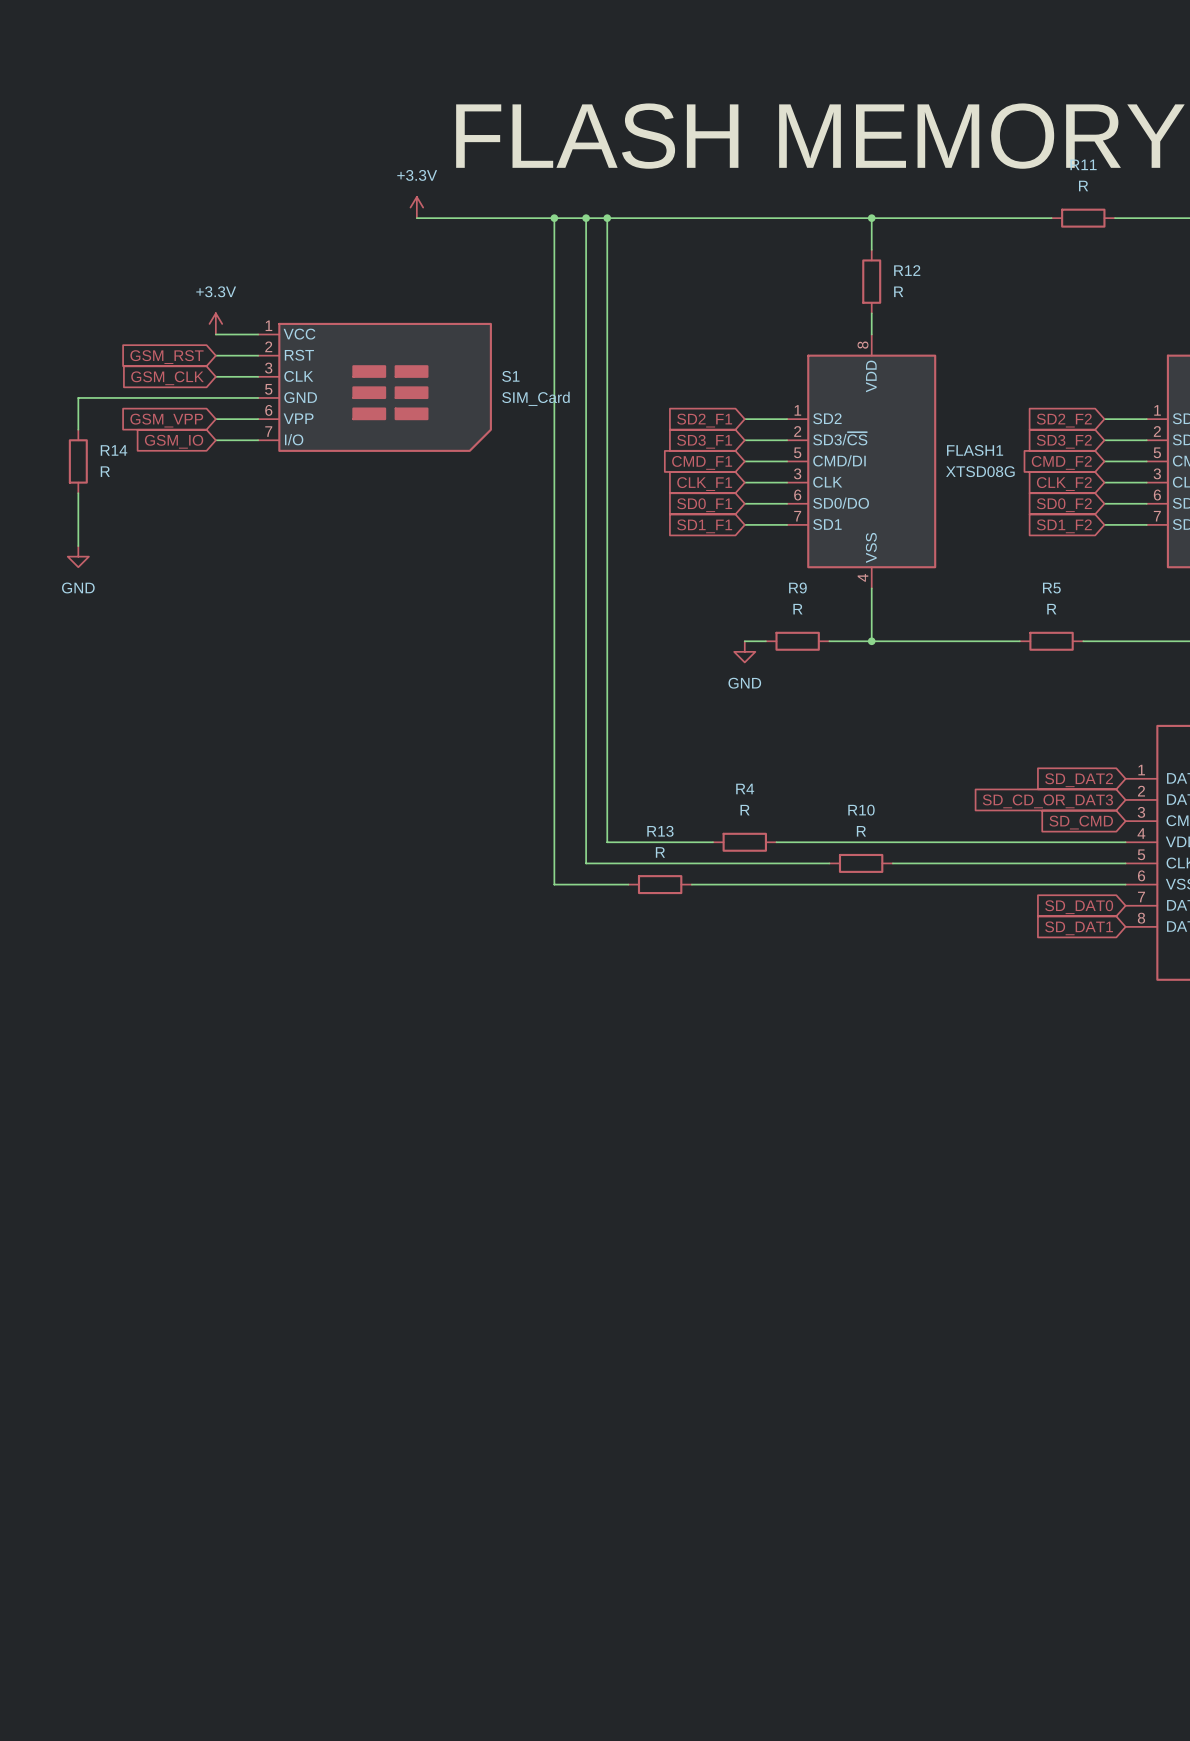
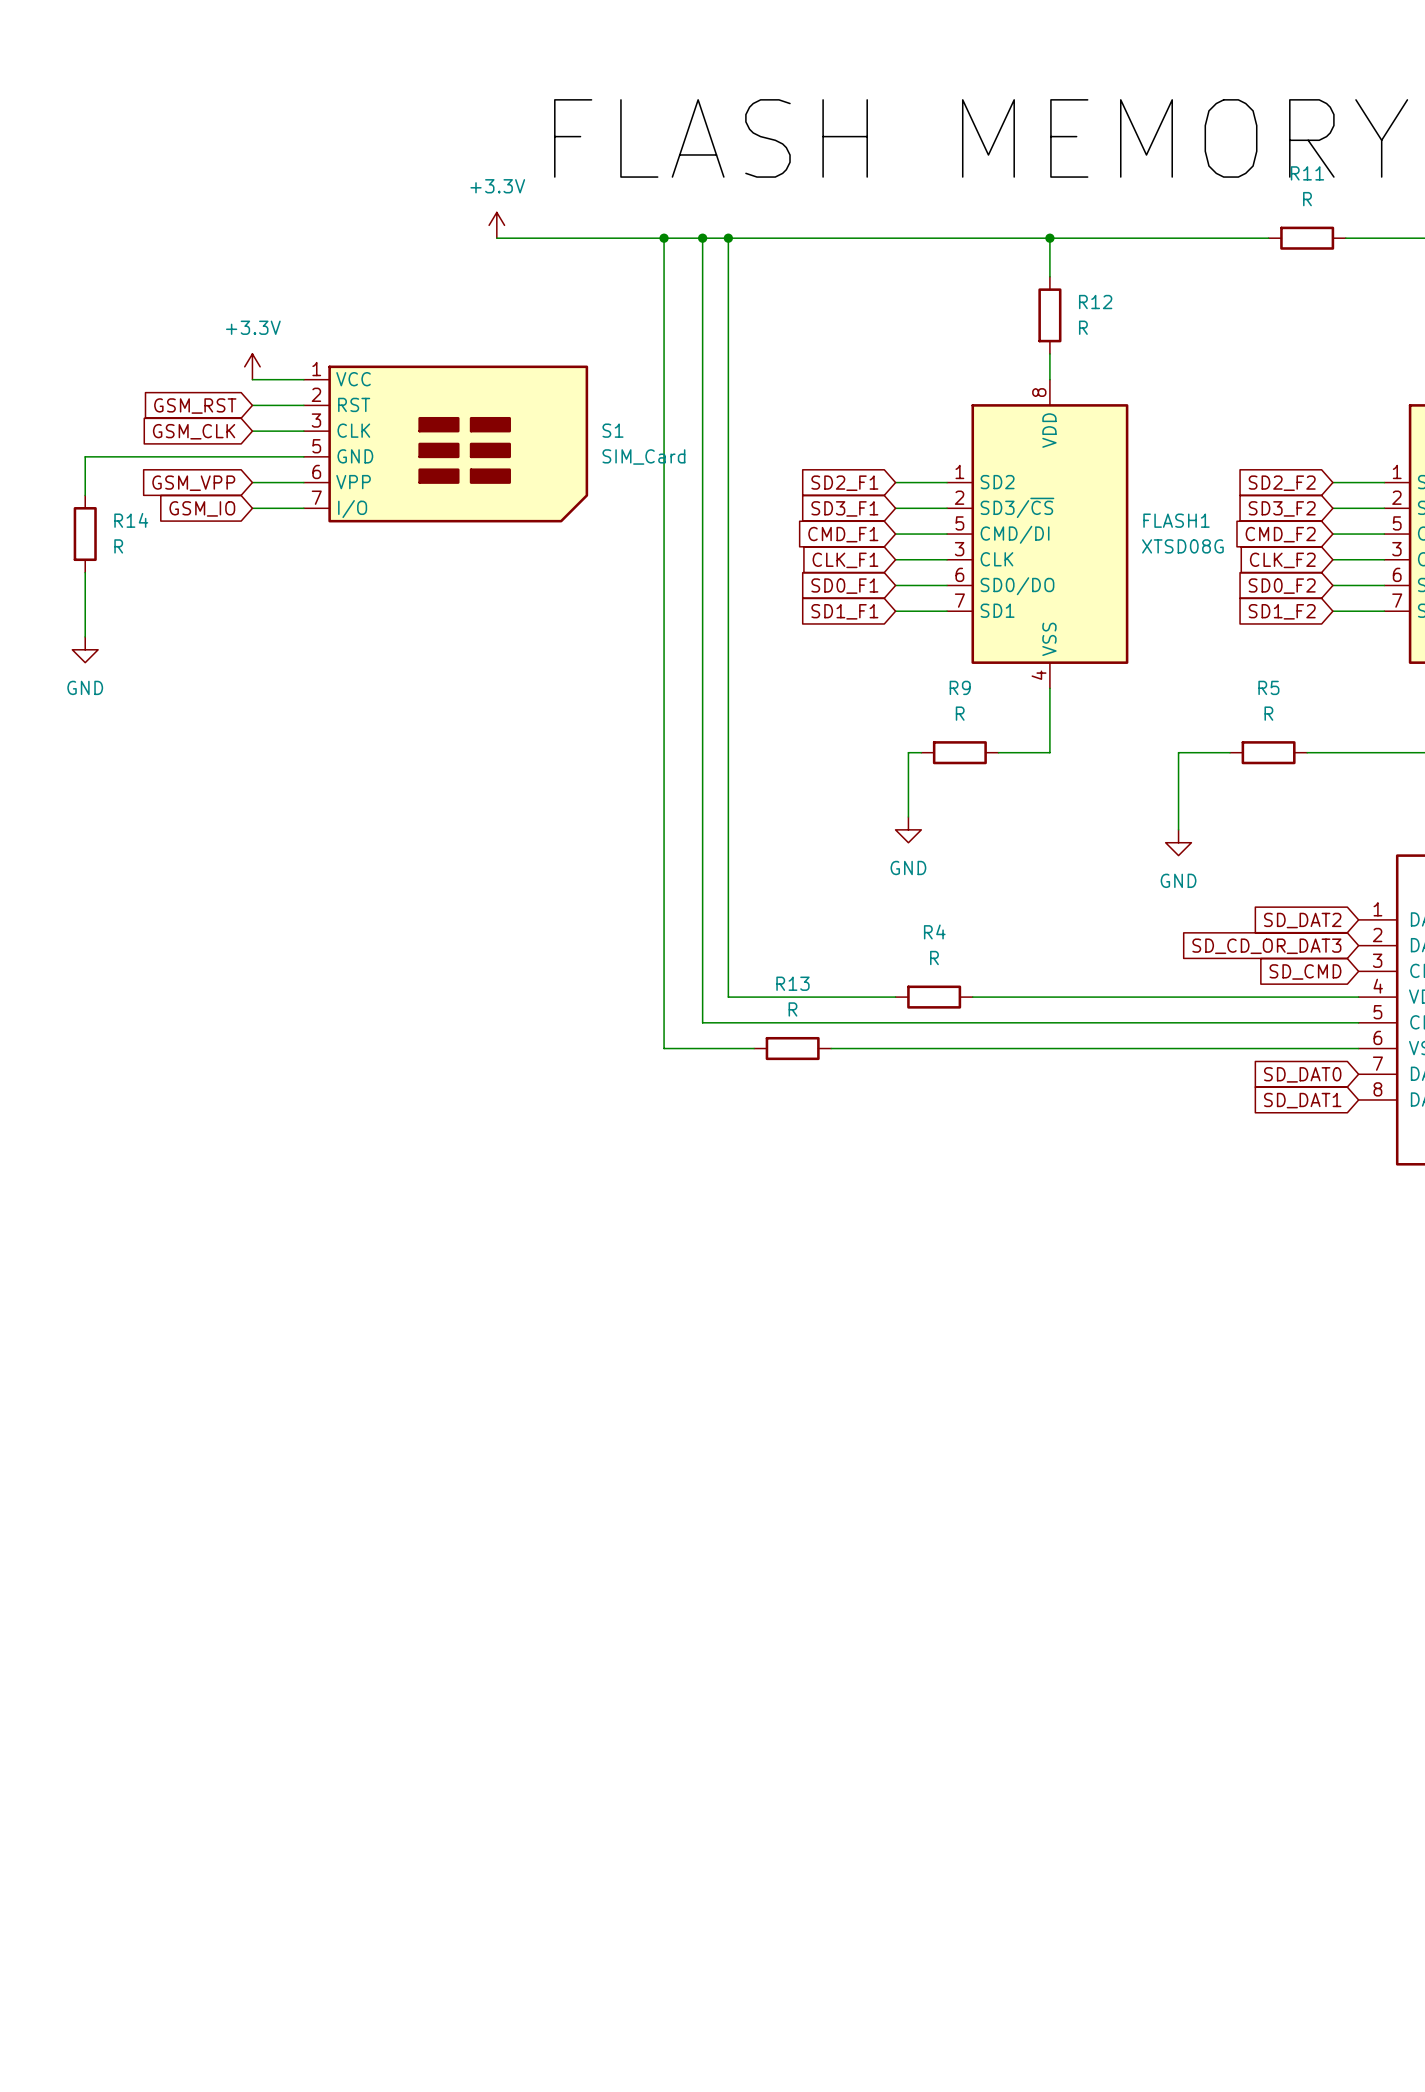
wire: (744, 641) (755, 641) -> (908, 817) (908, 752)
wire: (871, 641) (977, 641) -> (1178, 829) (1178, 752)
junction: (871, 641) -> none
power symbol position: GND (744, 651) -> GND (908, 829)
power symbol: none -> GND (1178, 842)
R4 position: (744, 842) -> (934, 997)
wire: (776, 842) (808, 842) -> (856, 997) (895, 997)
wire: none -> (998, 1022) (1075, 1022)
R10: R (861, 863) -> none

